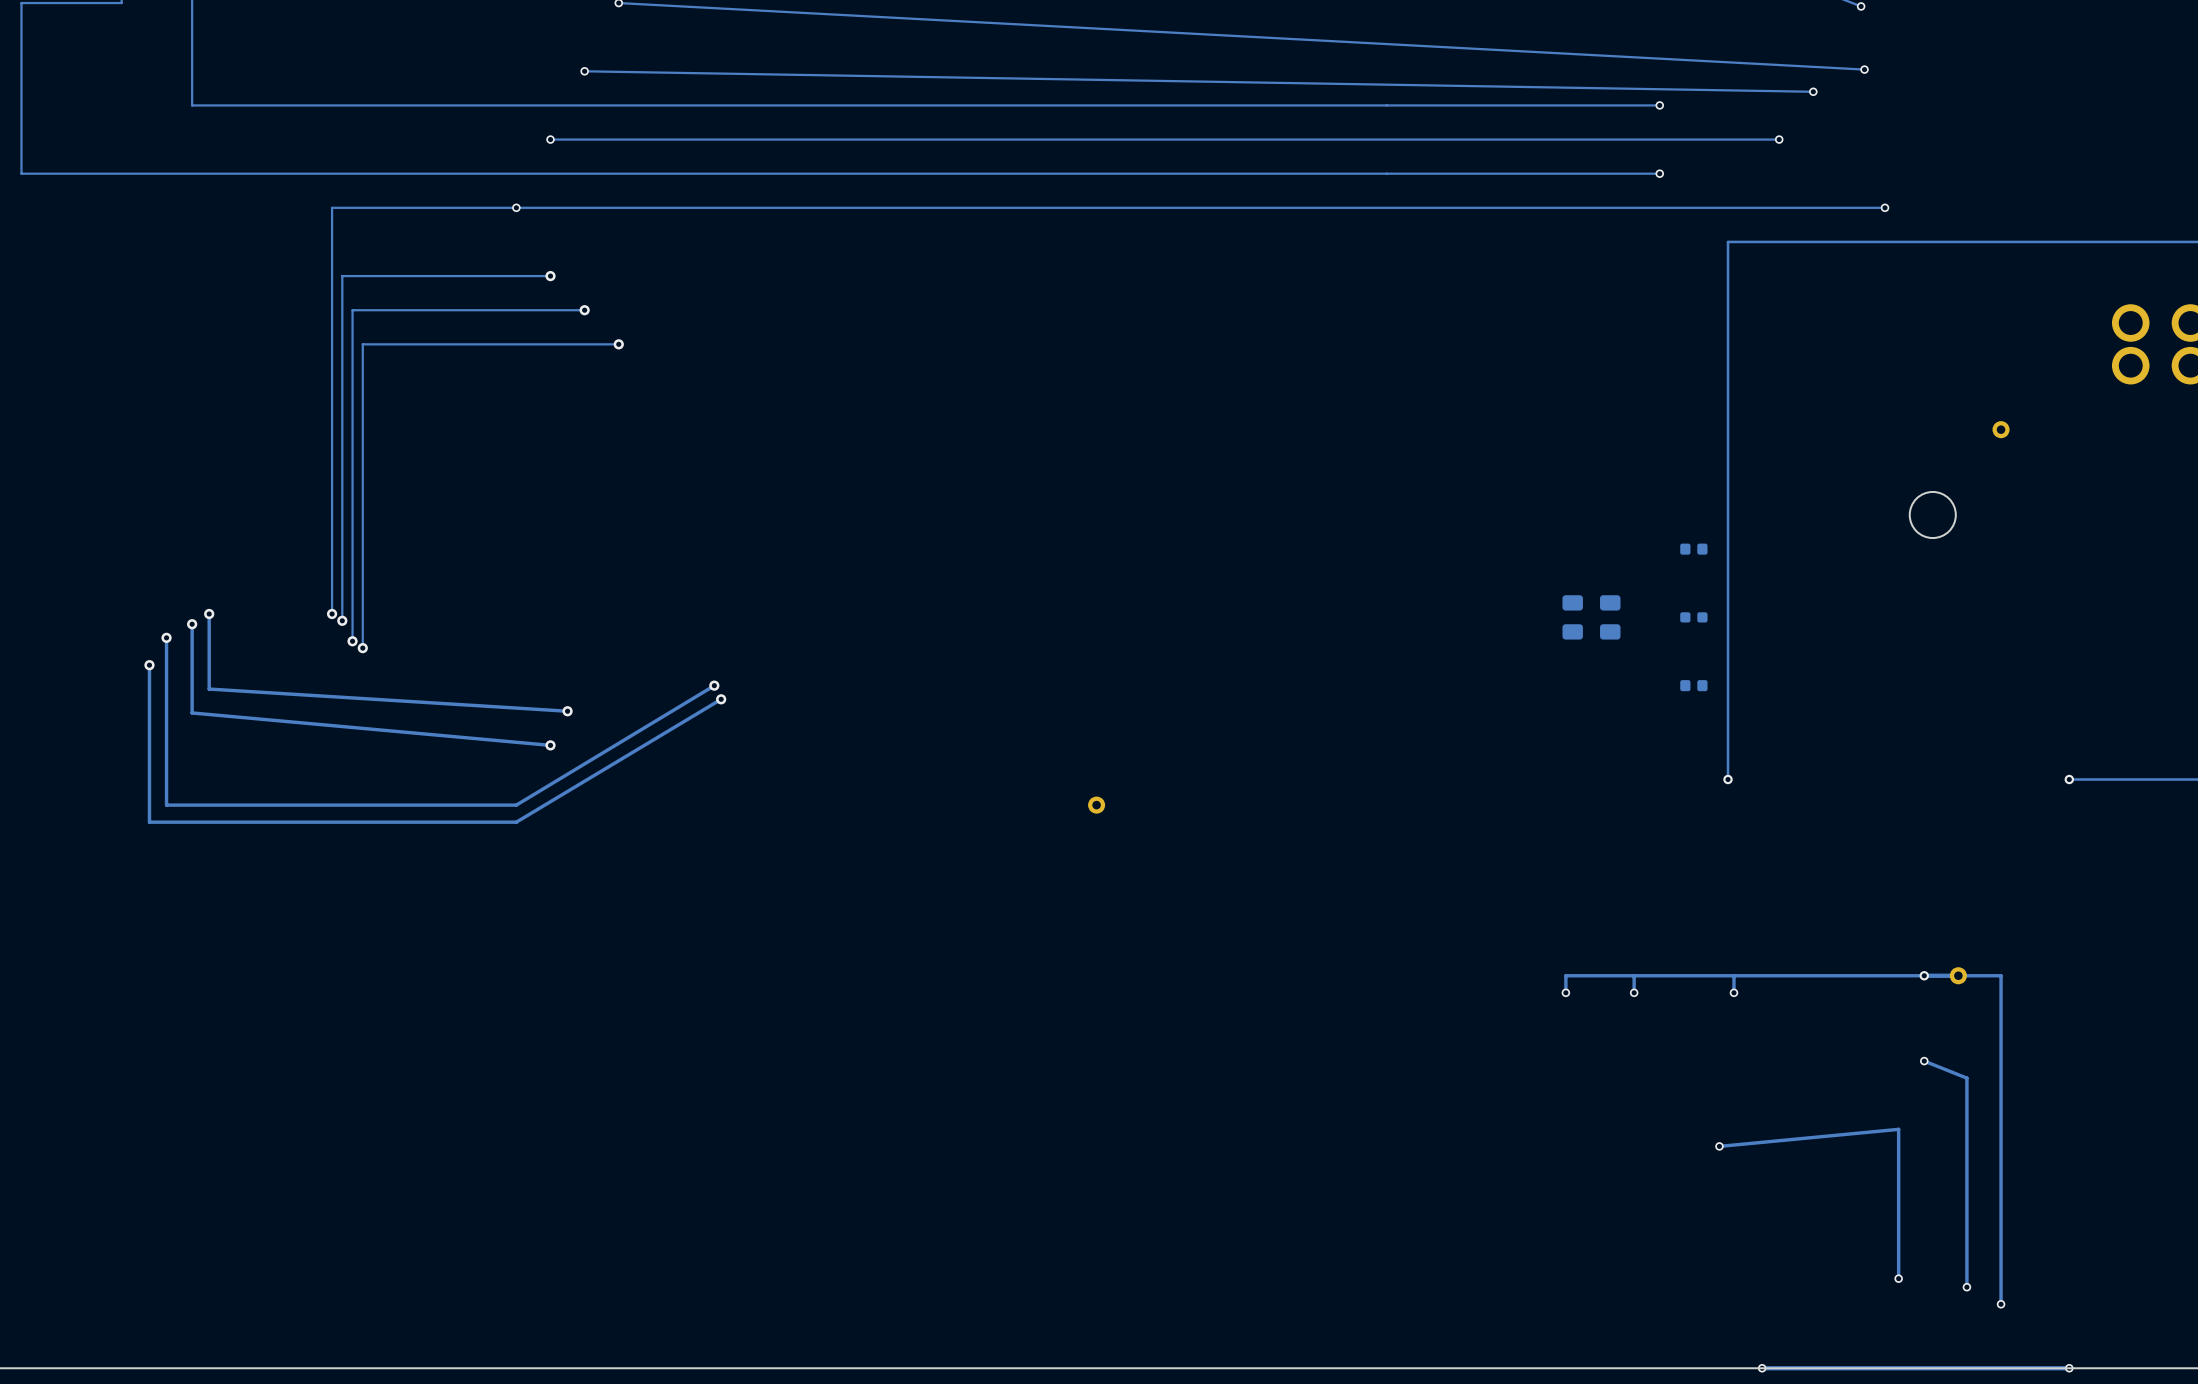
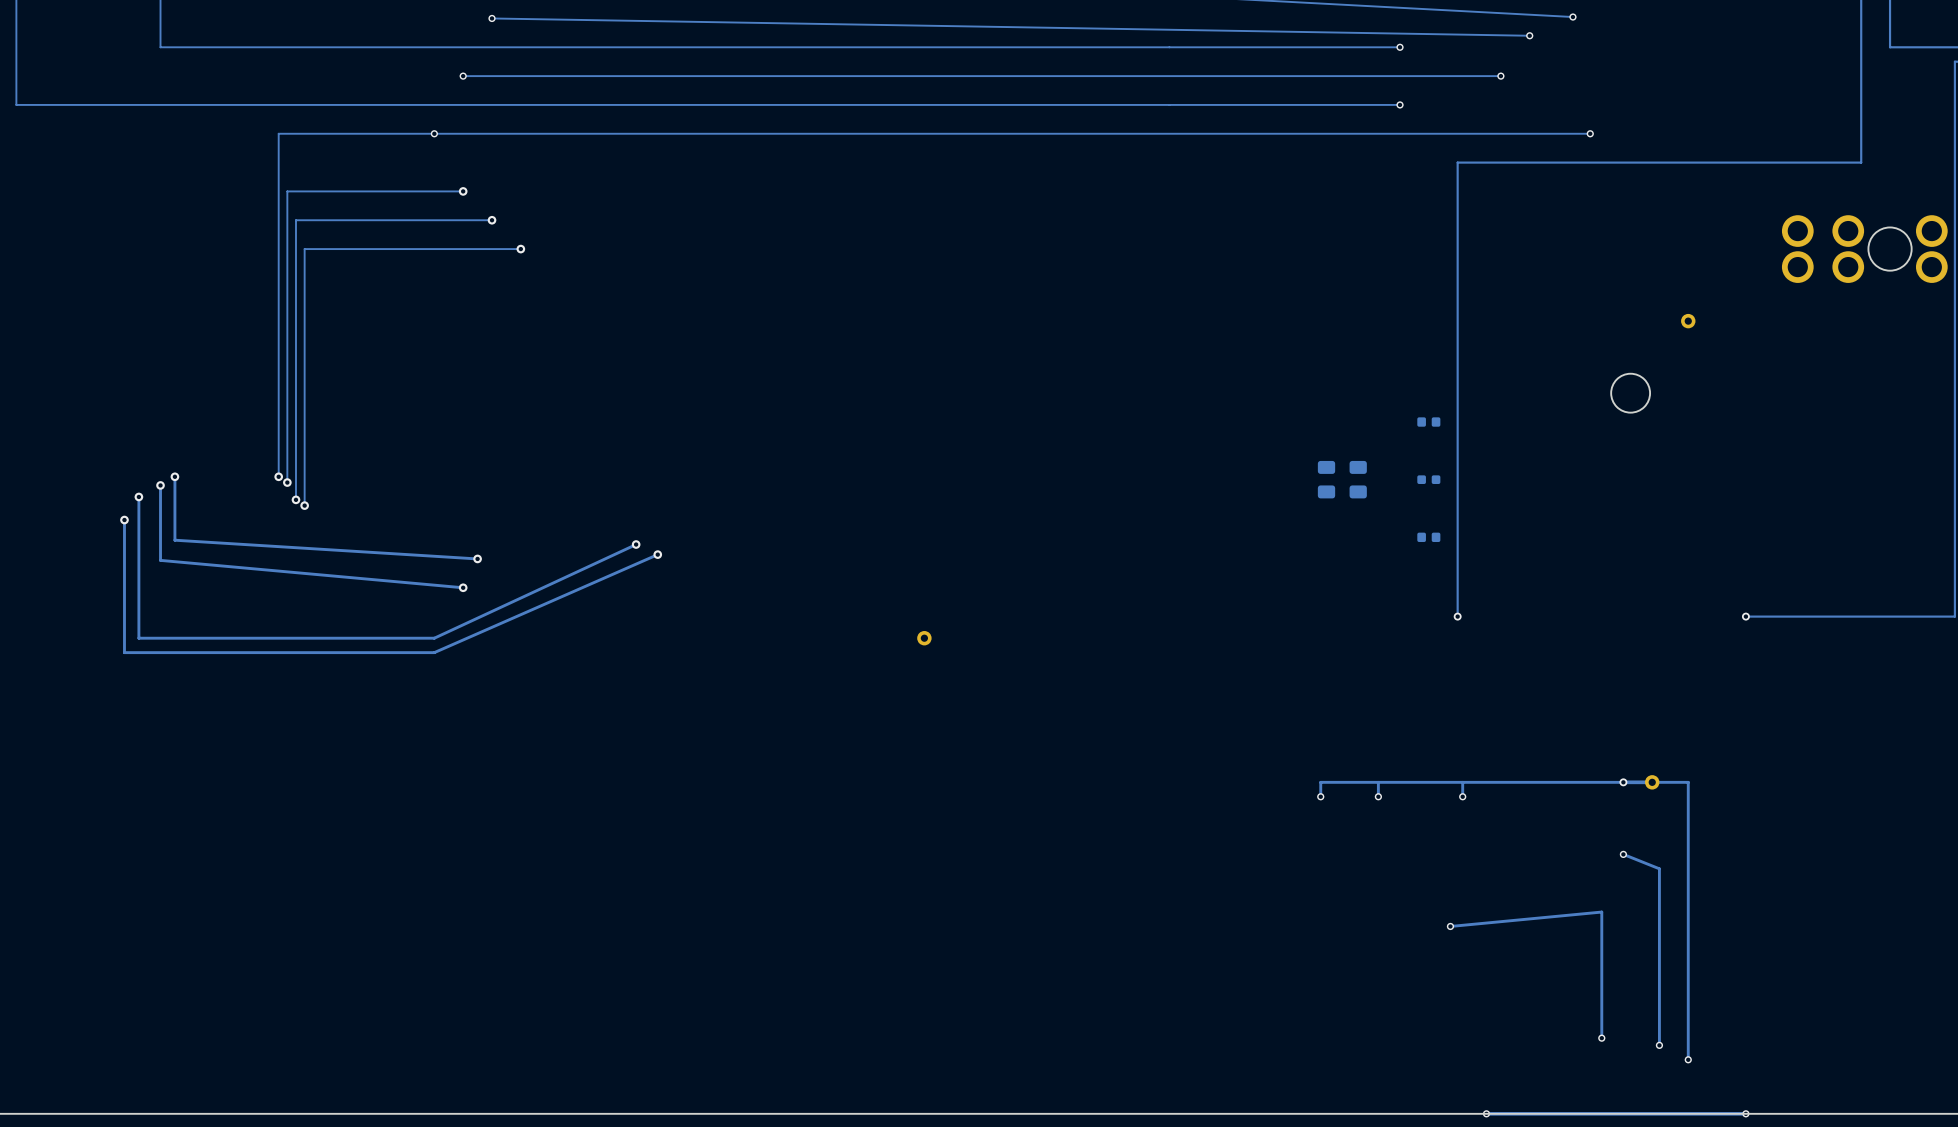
track: (714, 685) (516, 805) -> (636, 544) (434, 638)
via: (714, 685) -> none
via: none -> (636, 544)
track: (721, 699) (516, 822) -> (657, 554) (434, 652)
via: (721, 699) -> none
via: none -> (657, 554)

